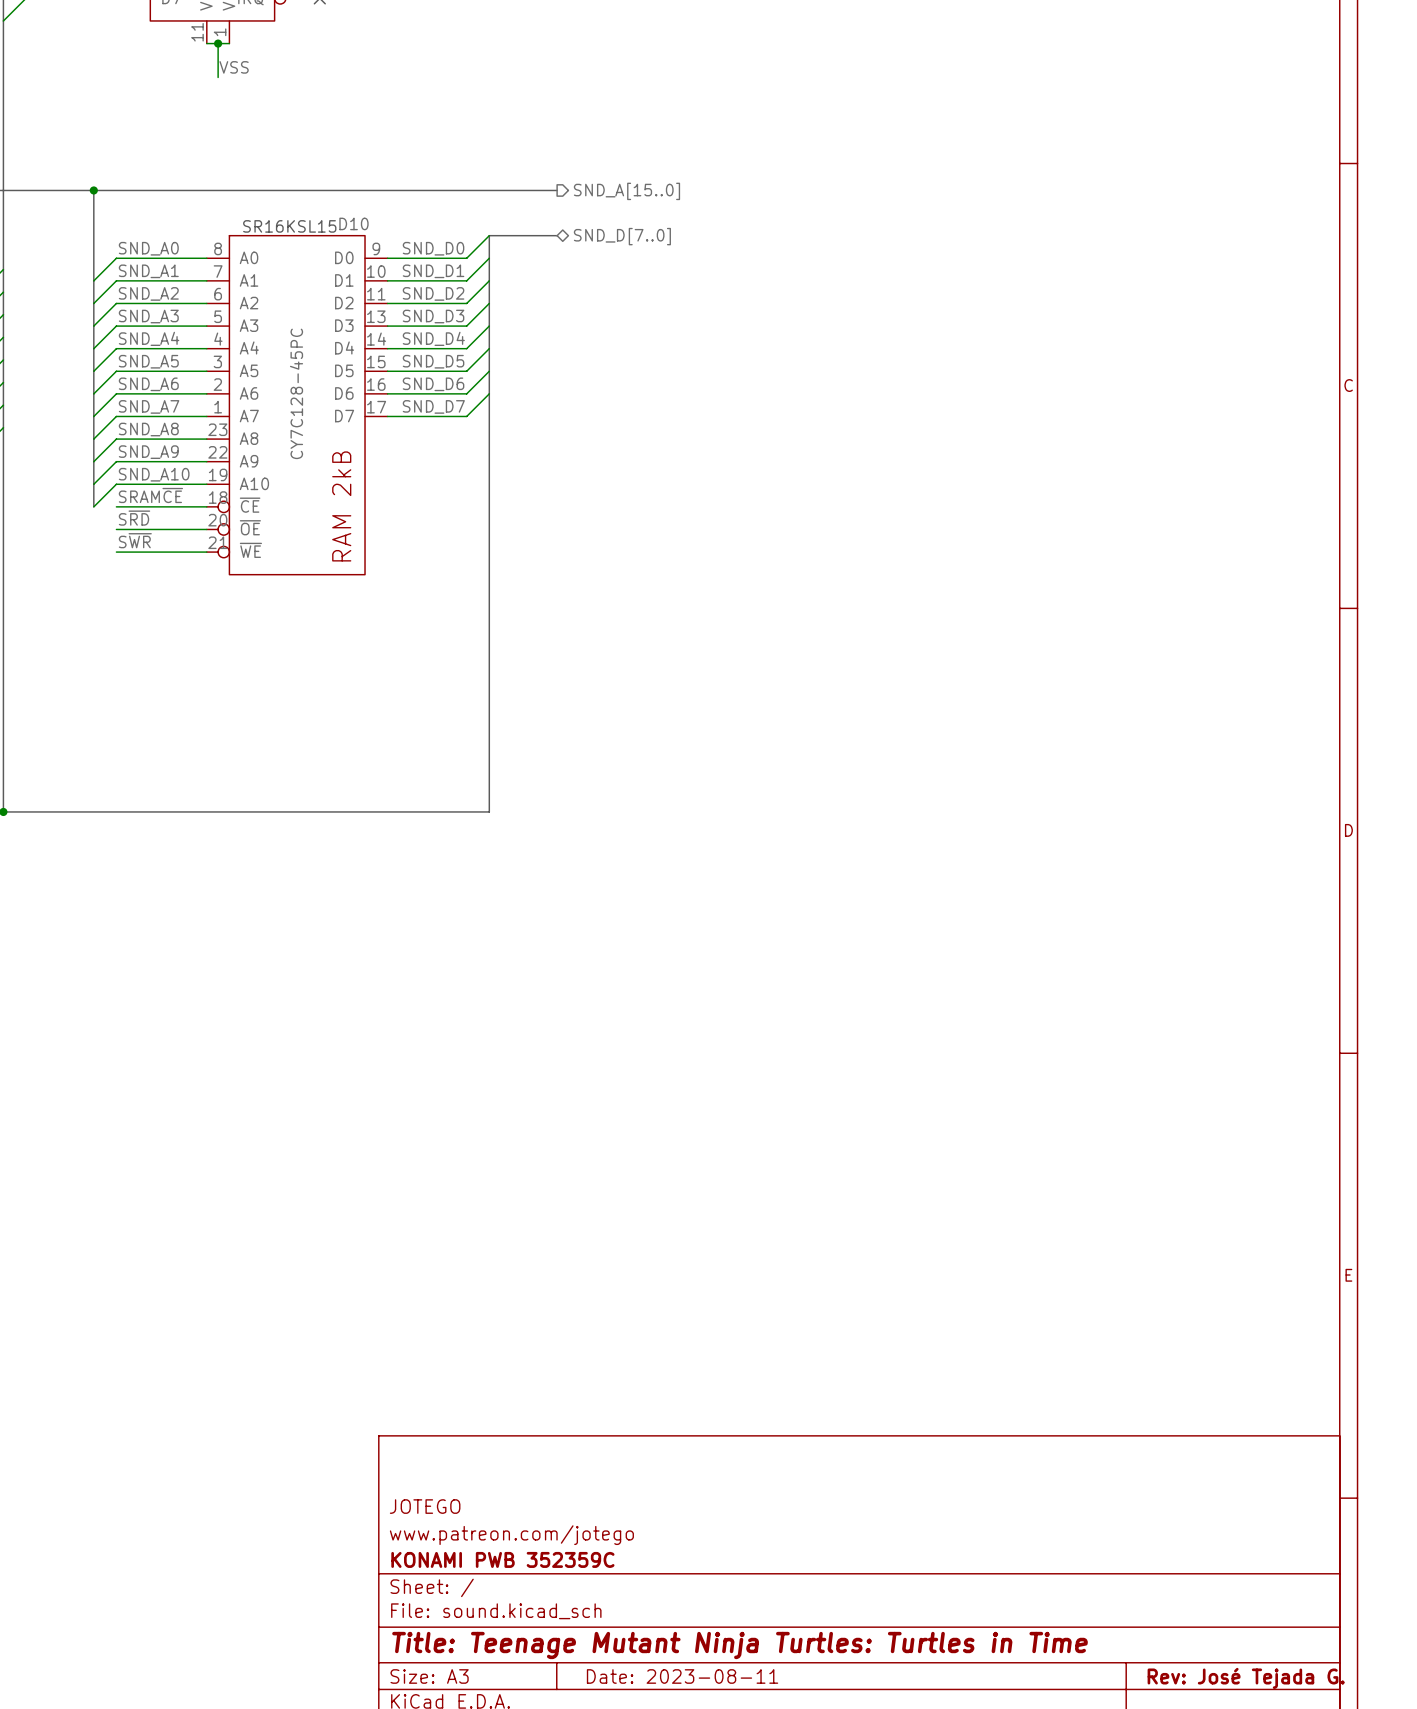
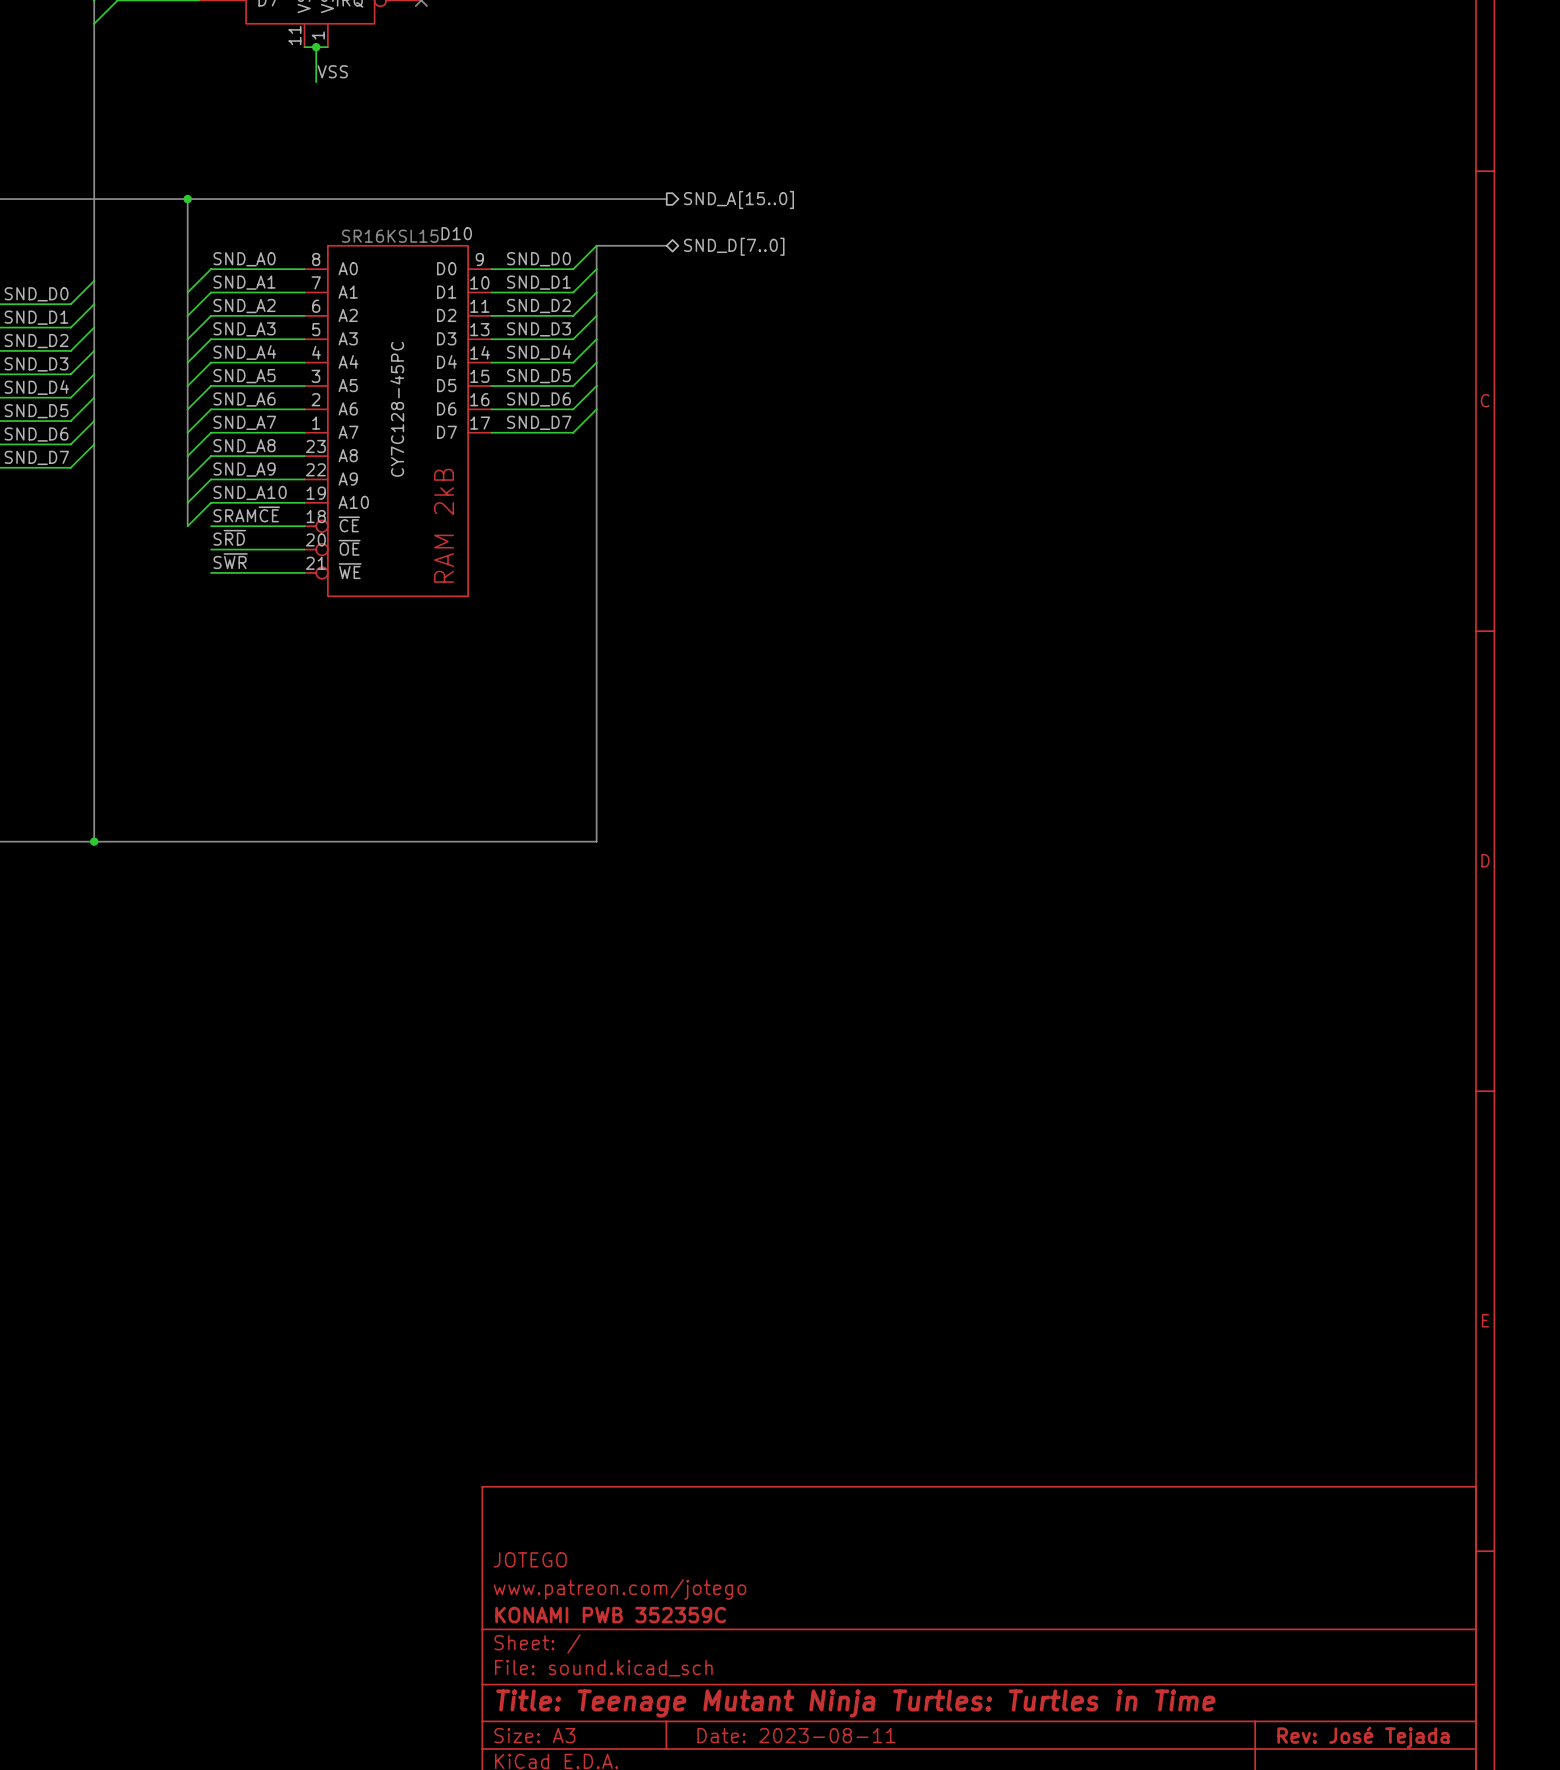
title block: Rev: José Tejada G. (1246, 1678) -> Rev: José Tejada (1363, 1737)

